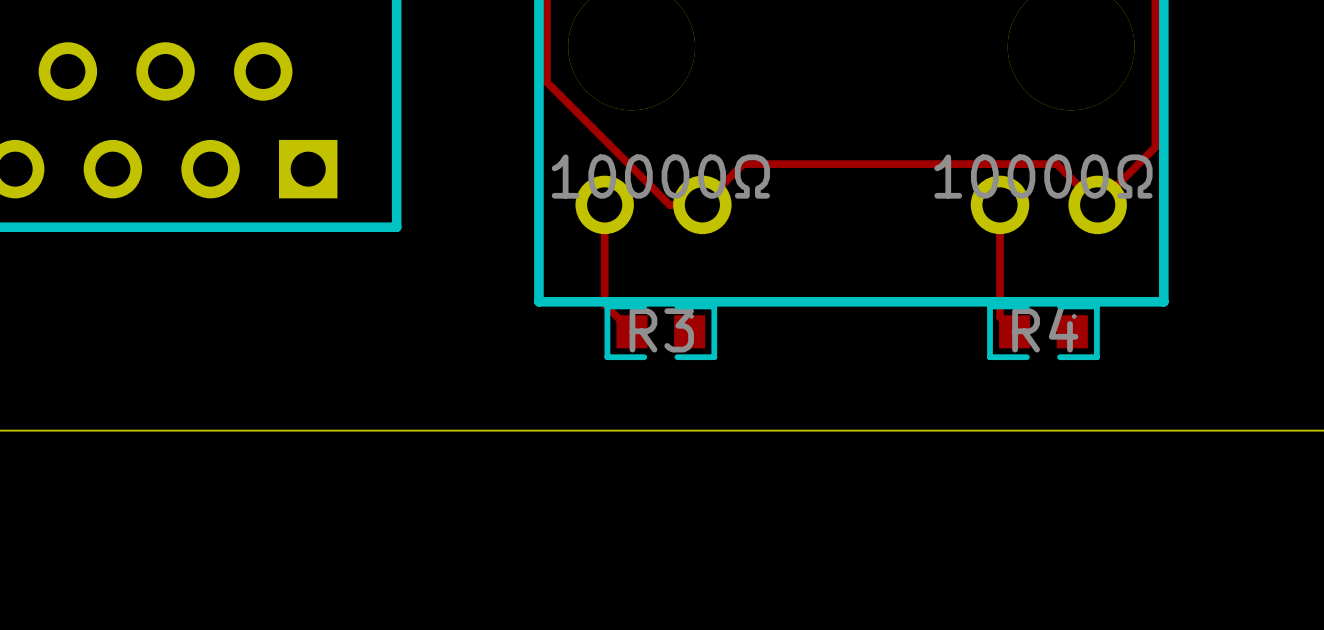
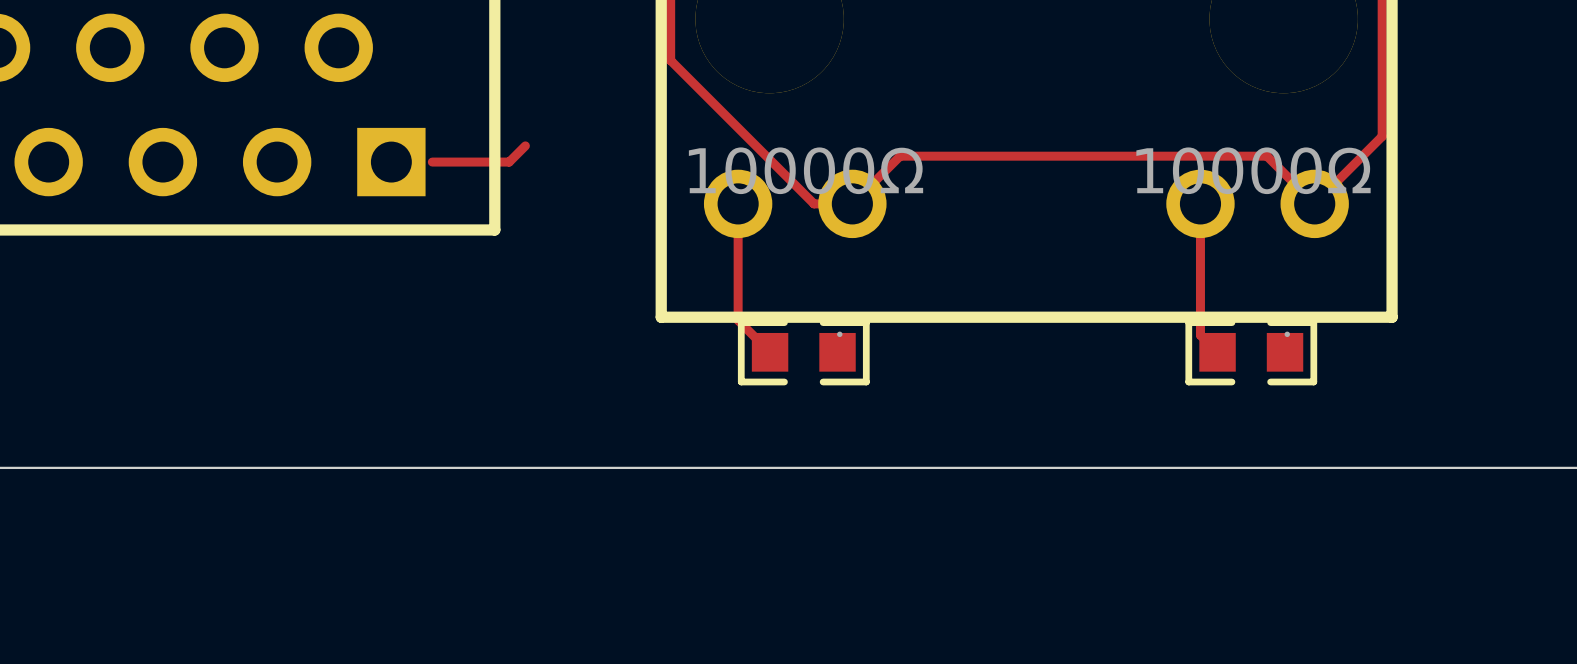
track: none -> (525, 145) (509, 162) (432, 162)
R4 name: R4 (1045, 329) -> none
R3 name: R3 (661, 330) -> none

